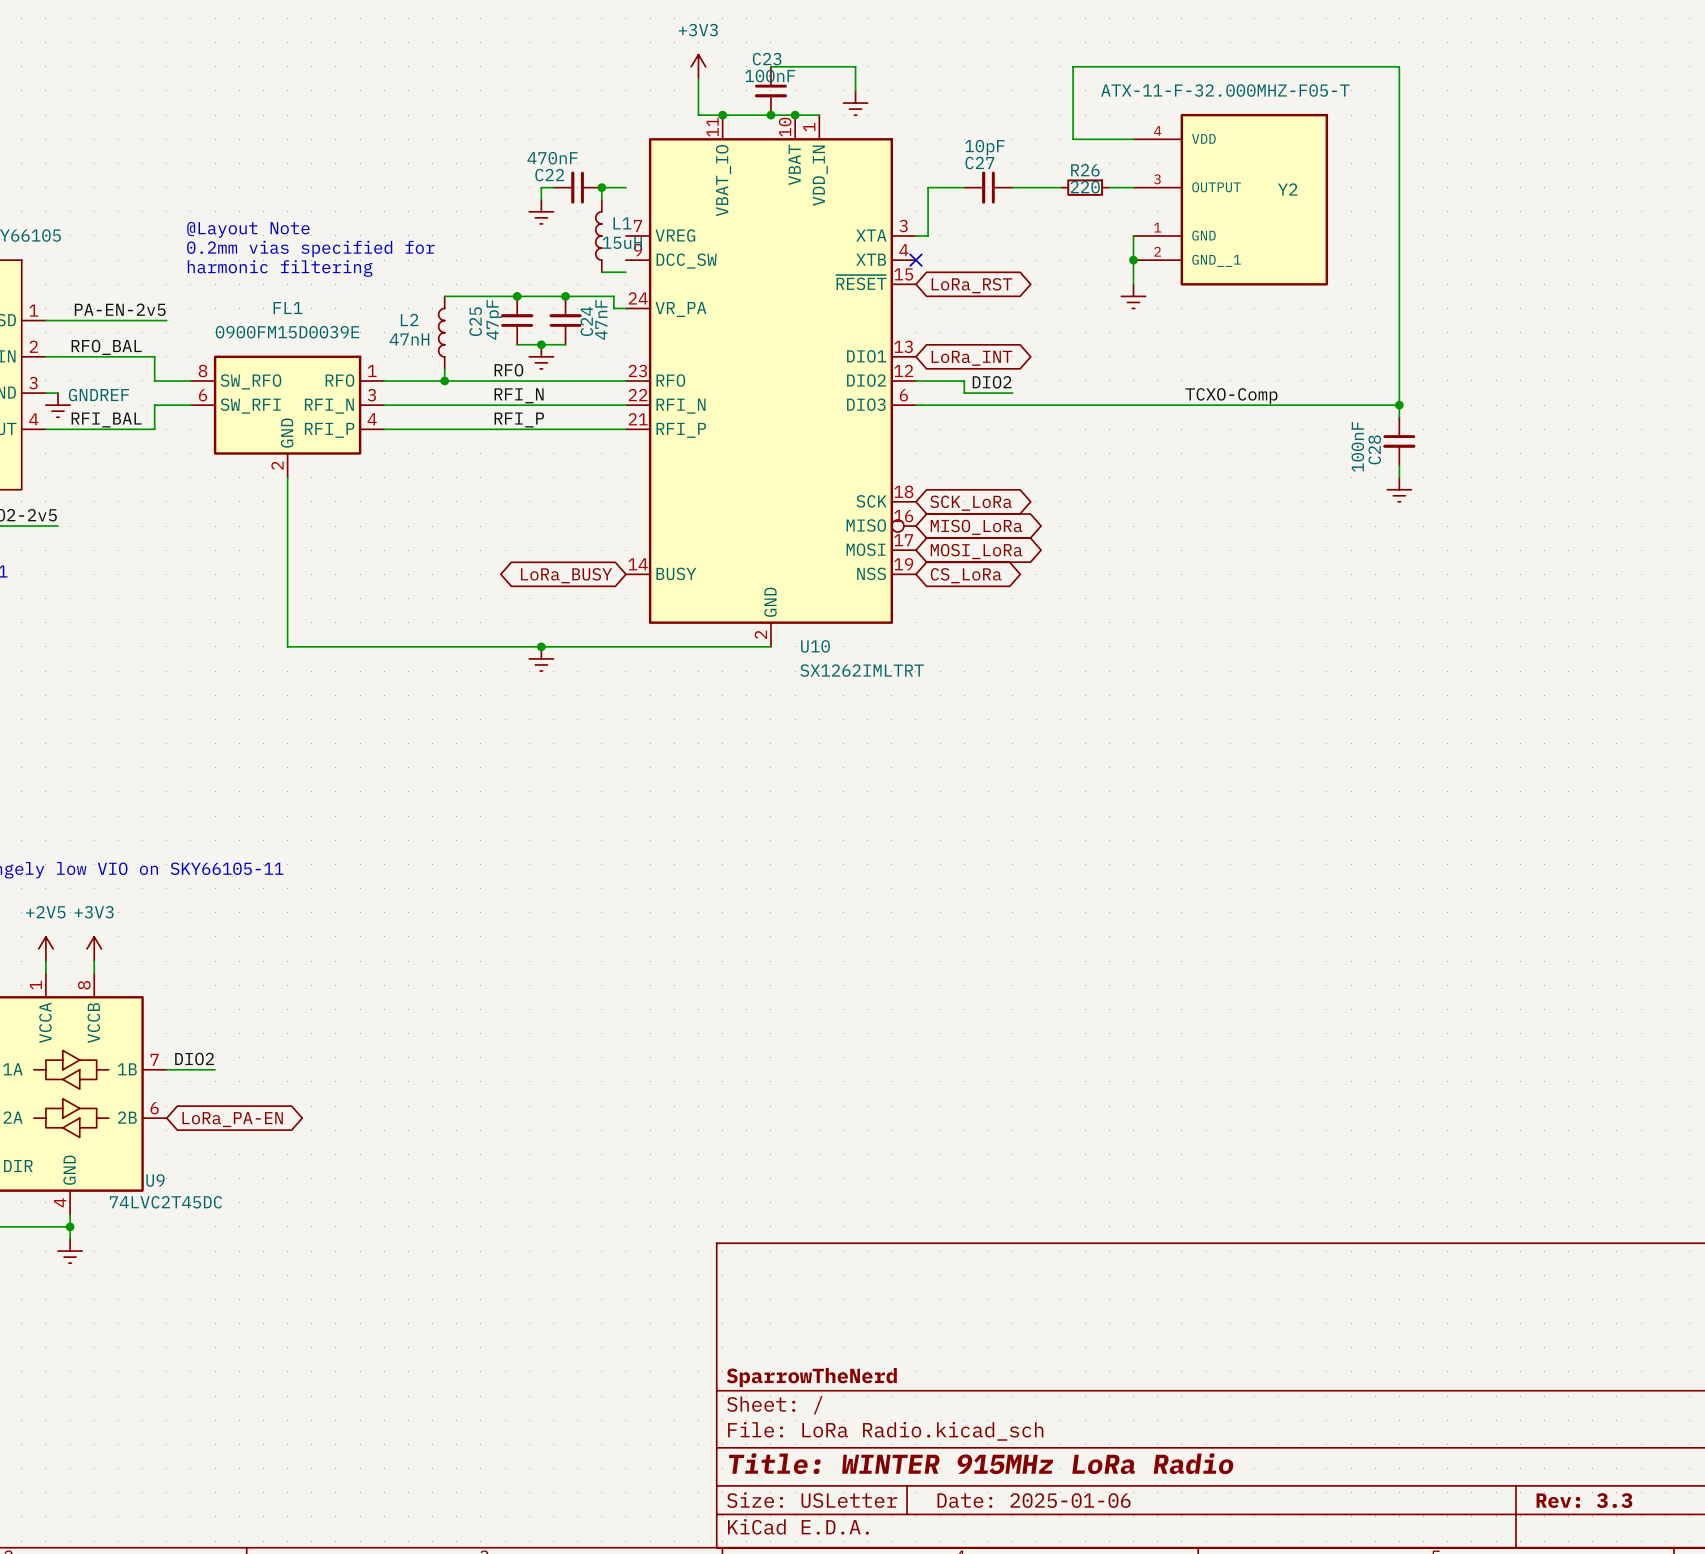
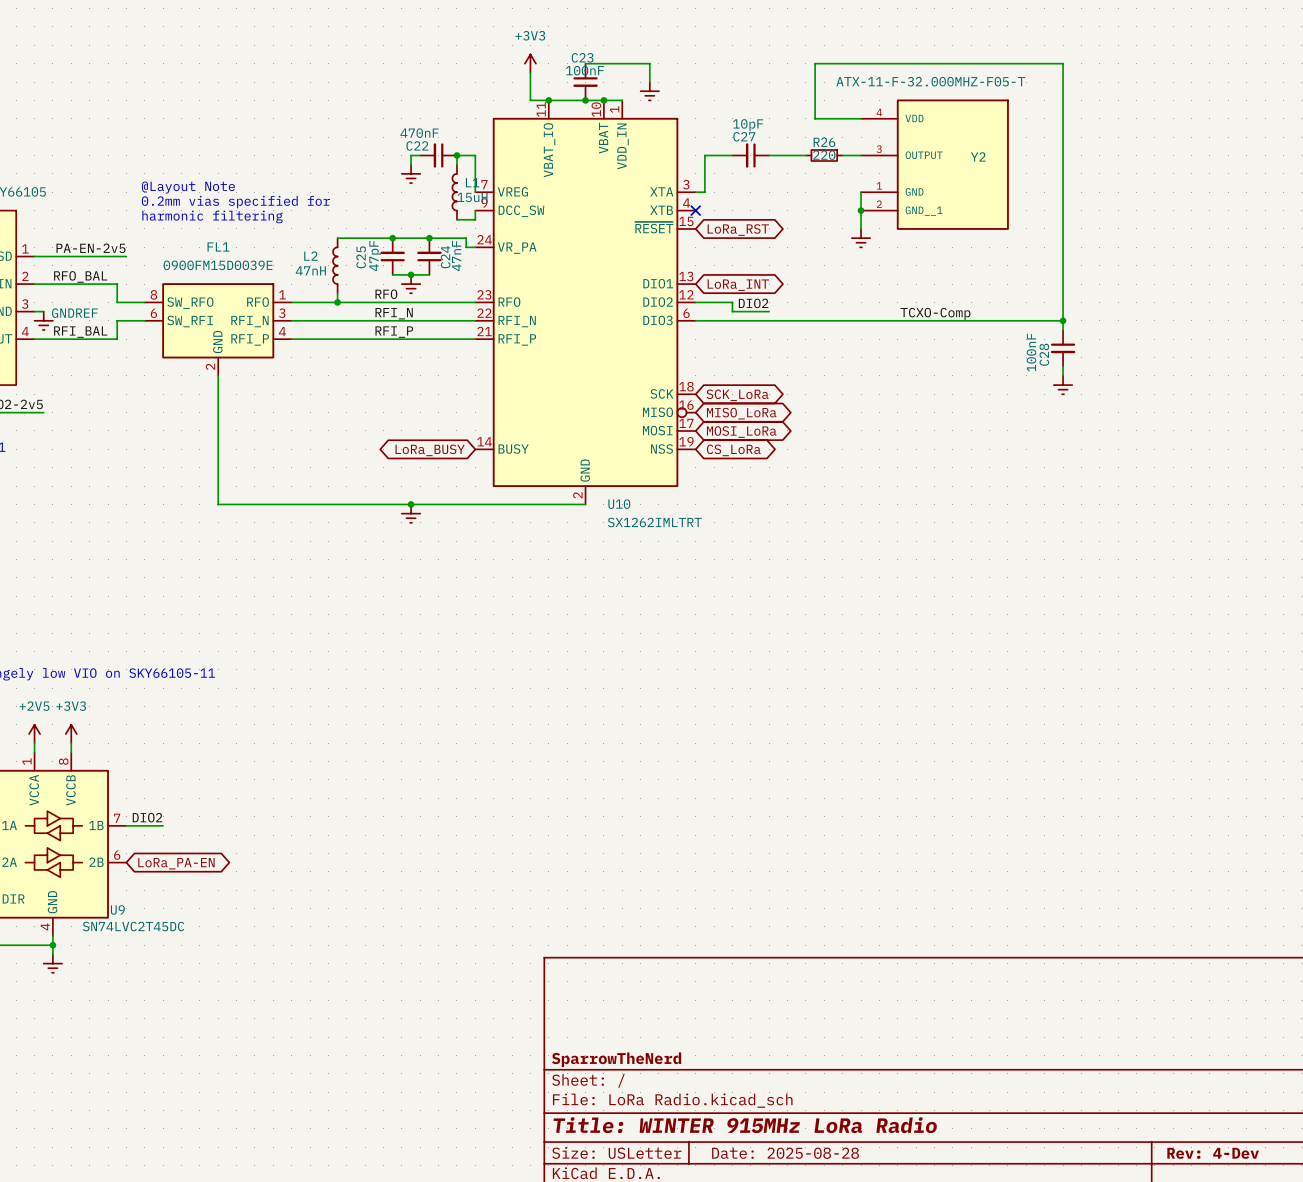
wire: none -> (475, 155) (475, 192)
wire: none -> (475, 210) (475, 219)
U9 value: 74LVC2T45DC (165, 1202) -> SN74LVC2T45DC (133, 926)
title block: Date: 2025-01-06 (1034, 1500) -> Date: 2025-08-28 (785, 1153)
title block: Rev: 3.3 (1584, 1500) -> Rev: 4-Dev (1213, 1153)

